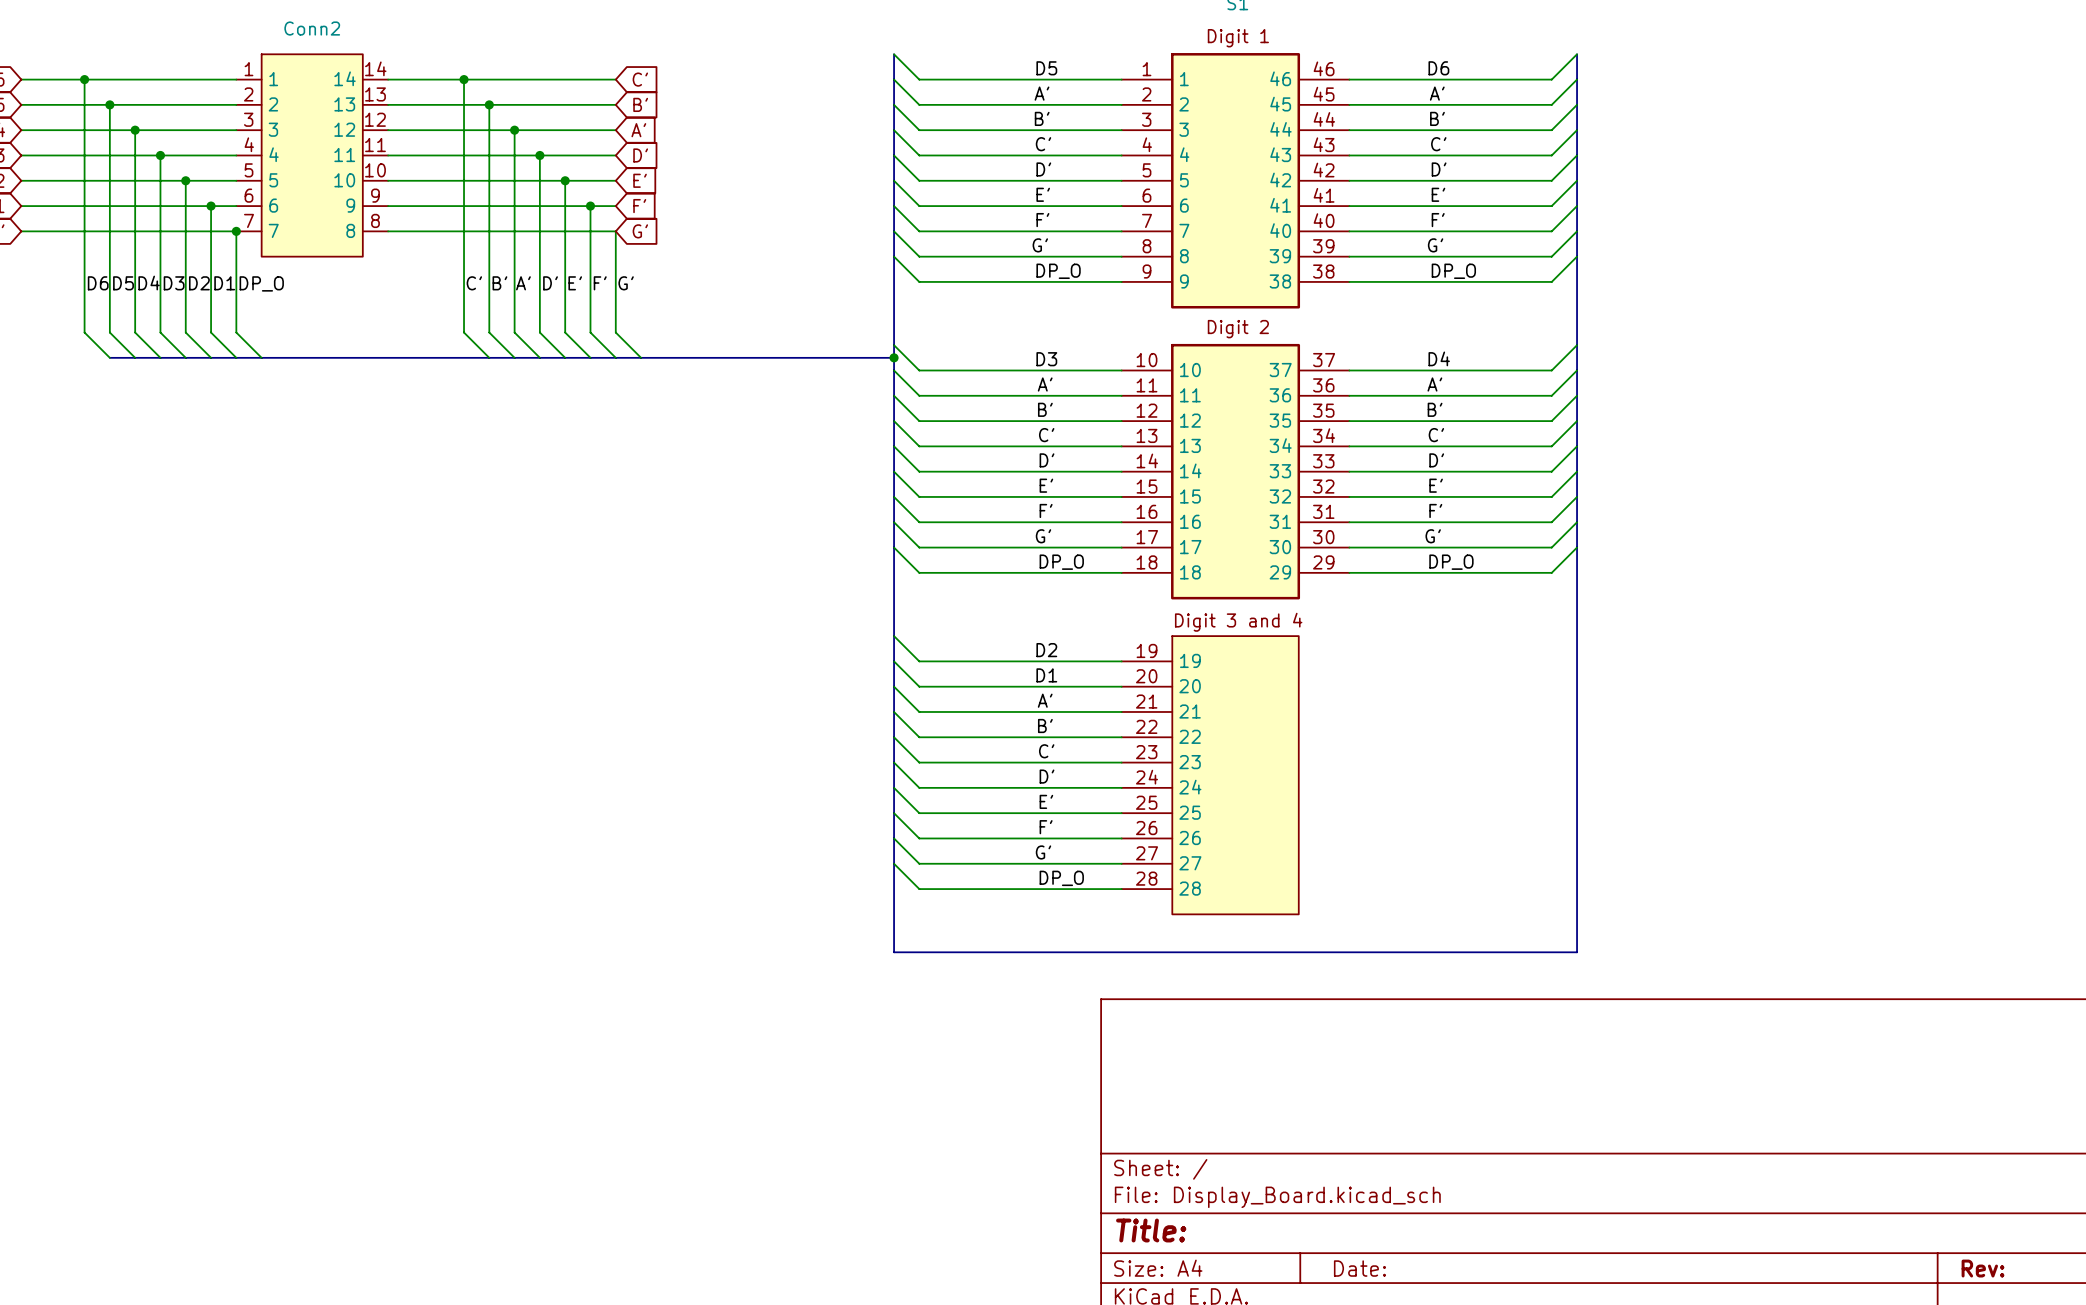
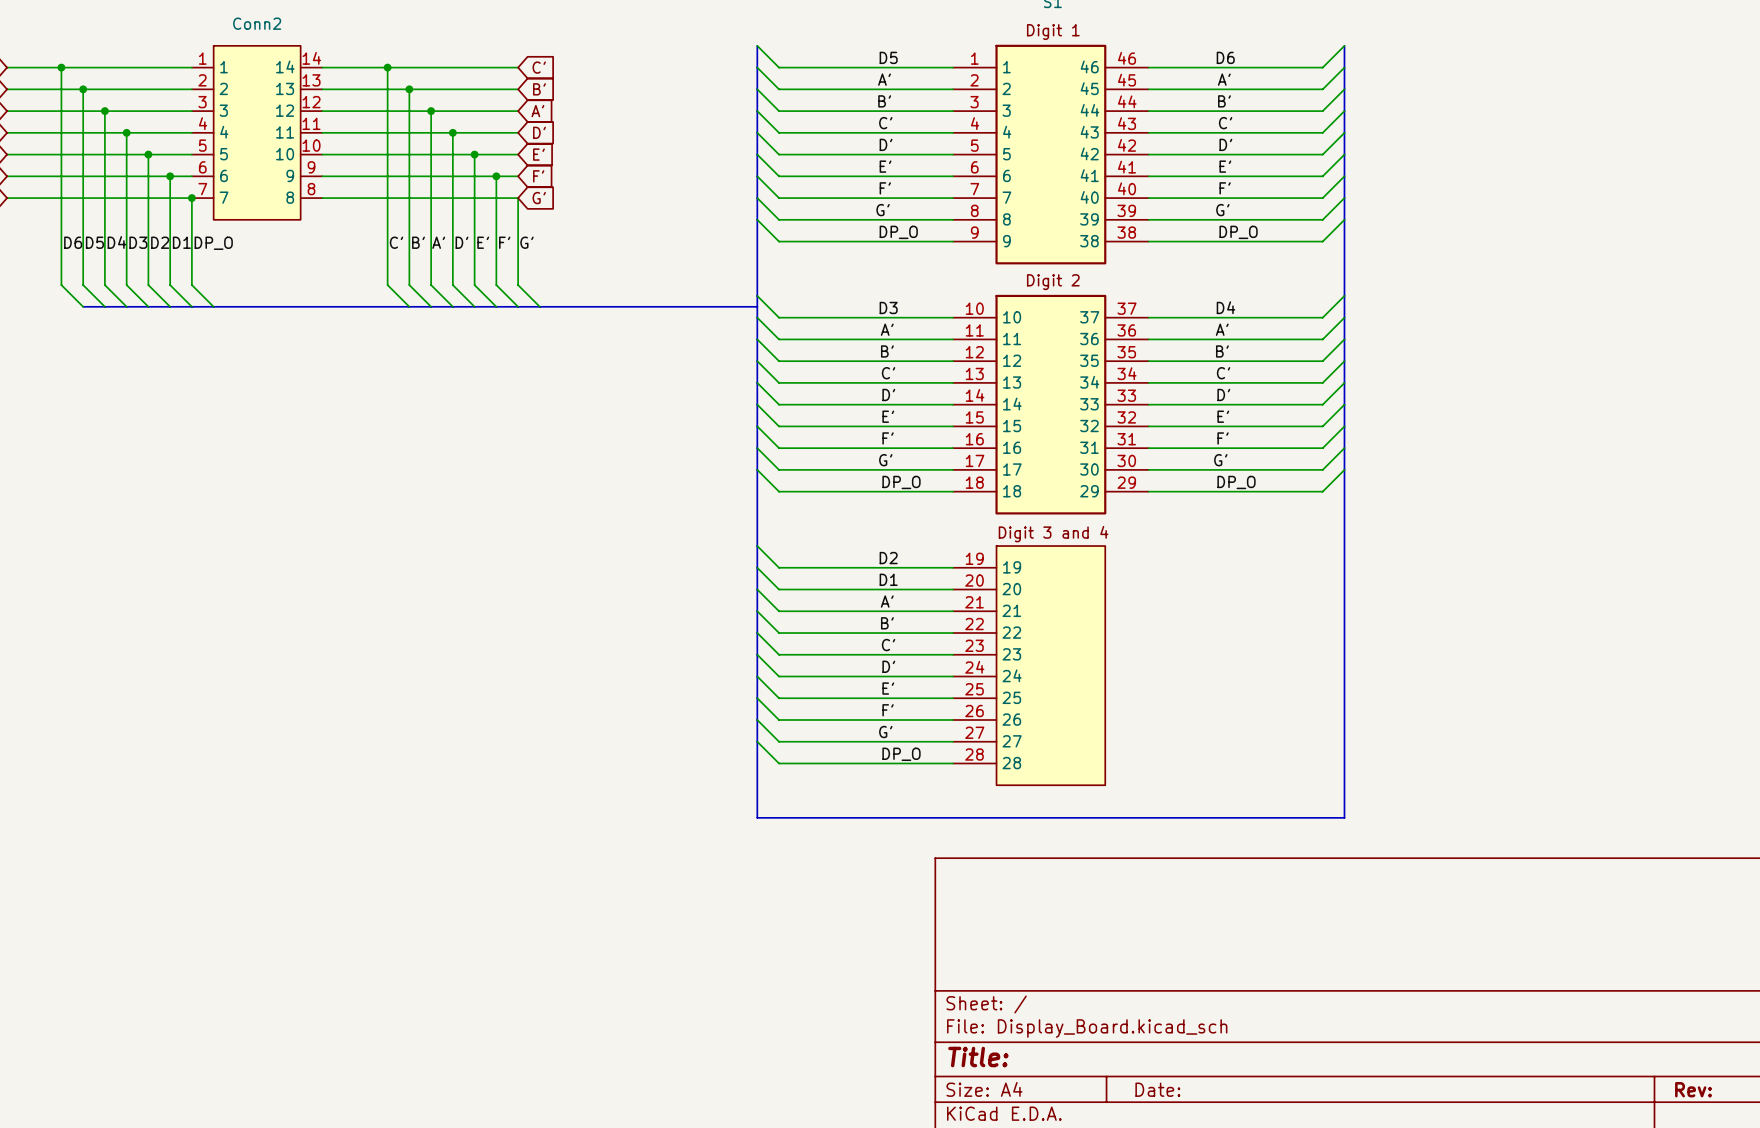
junction: (894, 357) -> none

